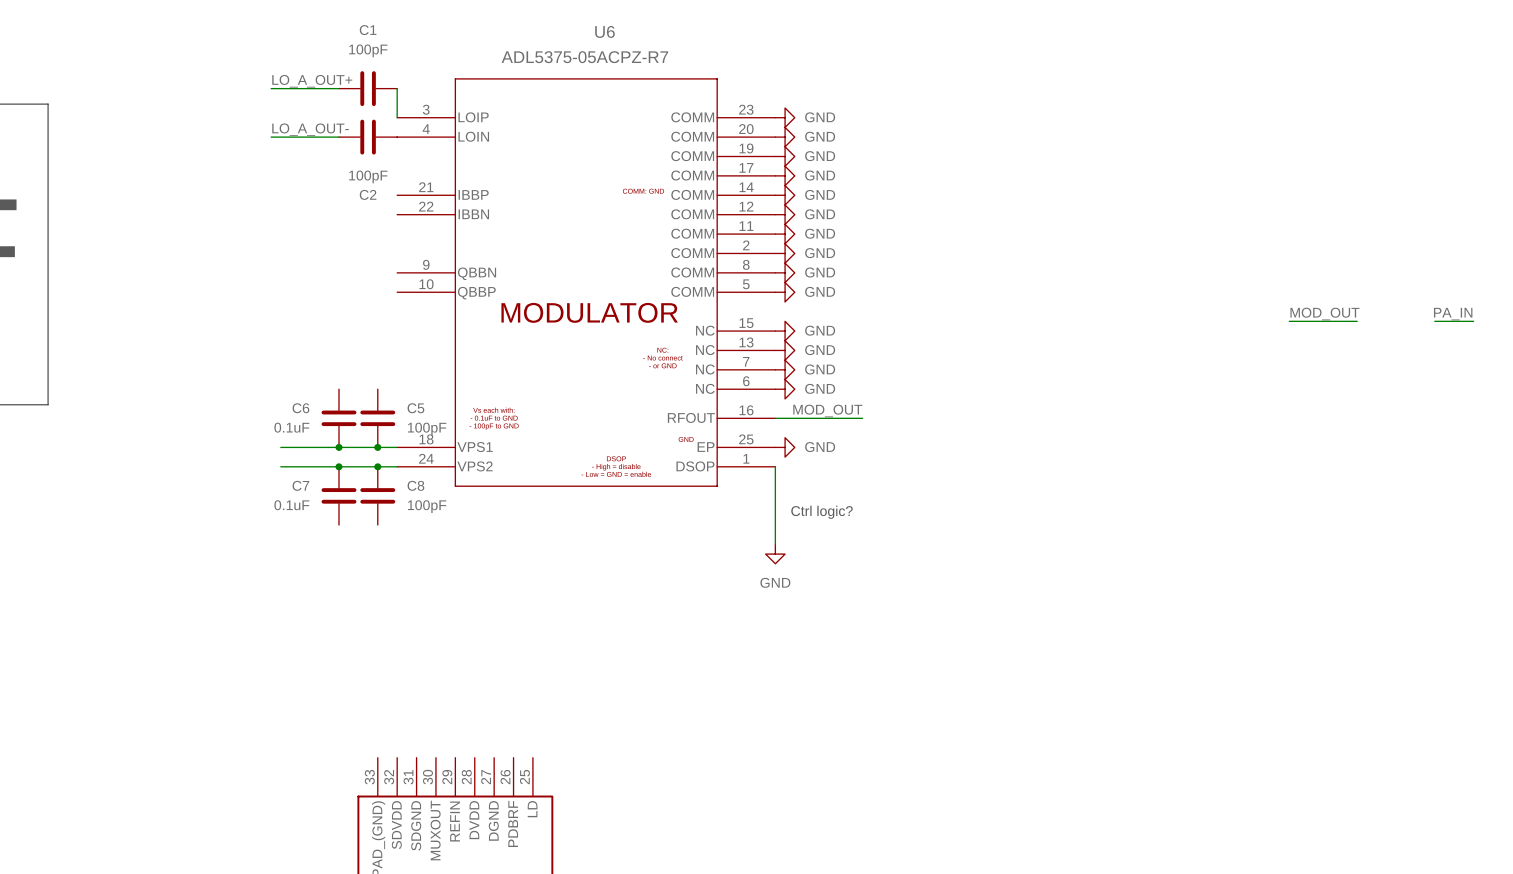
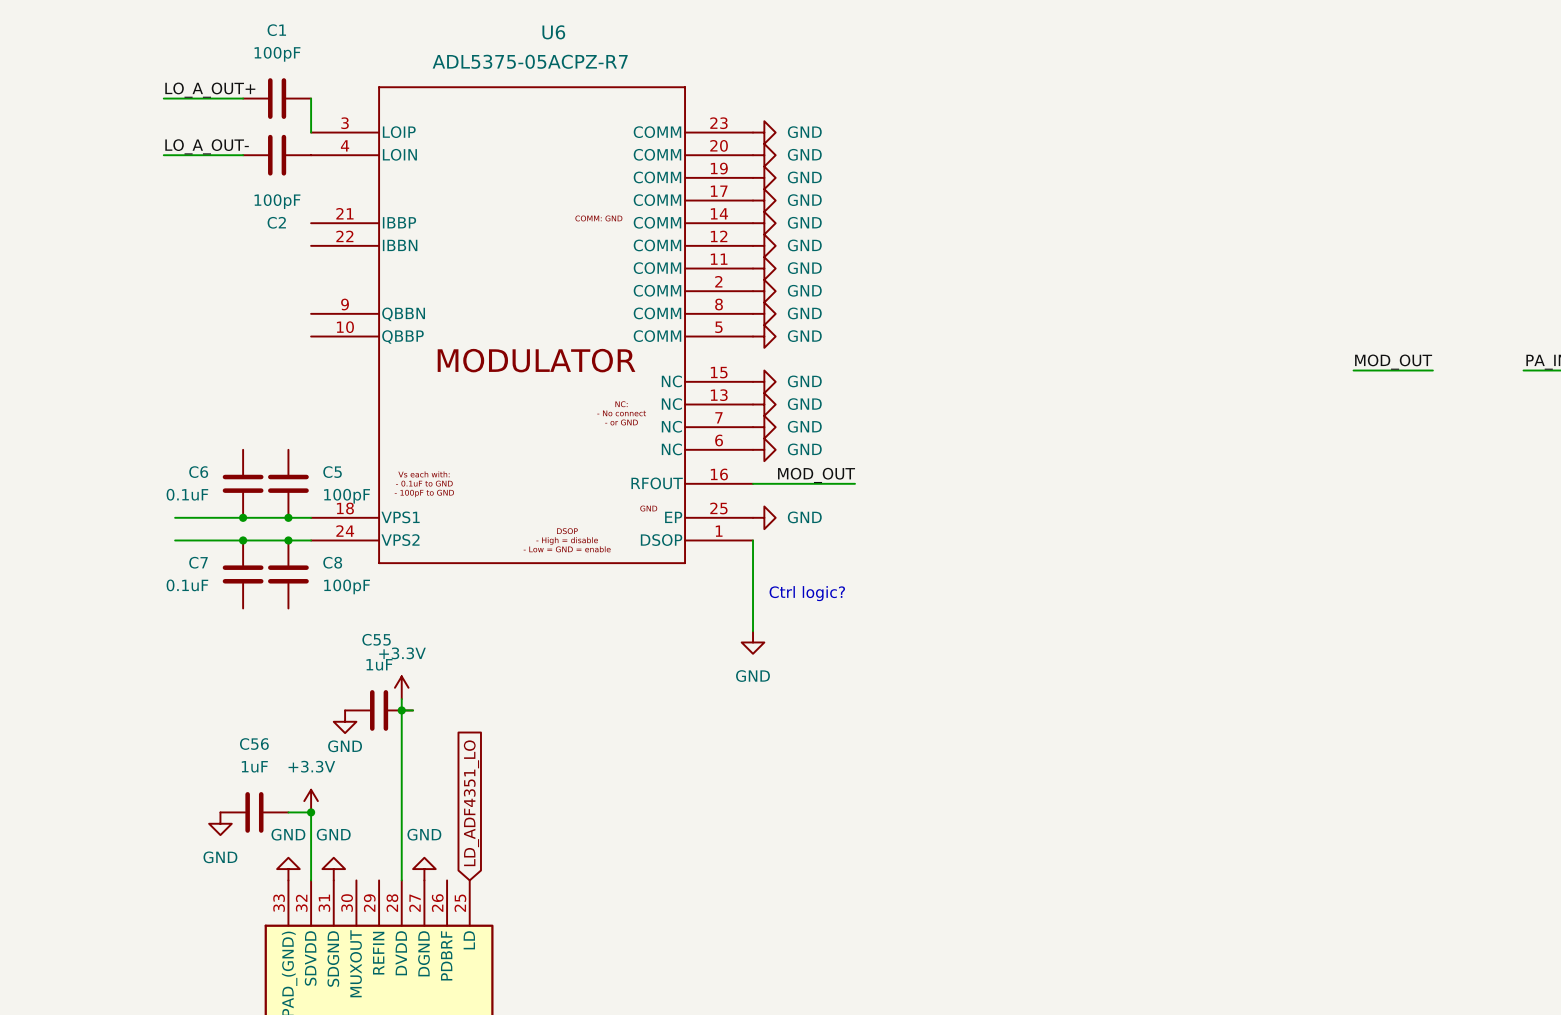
power symbol: none -> +3.3V (401, 687)
wire: none -> (401, 699) (401, 880)
C55: none -> 1uF (379, 710)
wire: none -> (401, 710) (413, 710)
junction: none -> (401, 710)
power symbol: none -> GND (345, 721)
power symbol: none -> +3.3V (311, 801)
global label: none -> LD_ADF4351_LO (471, 803)
C56: none -> 1uF (254, 812)
wire: none -> (288, 812) (311, 812) (311, 880)
junction: none -> (311, 812)
power symbol: none -> GND (220, 823)
power symbol: none -> GND (288, 869)
power symbol: none -> GND (333, 869)
power symbol: none -> GND (424, 869)

